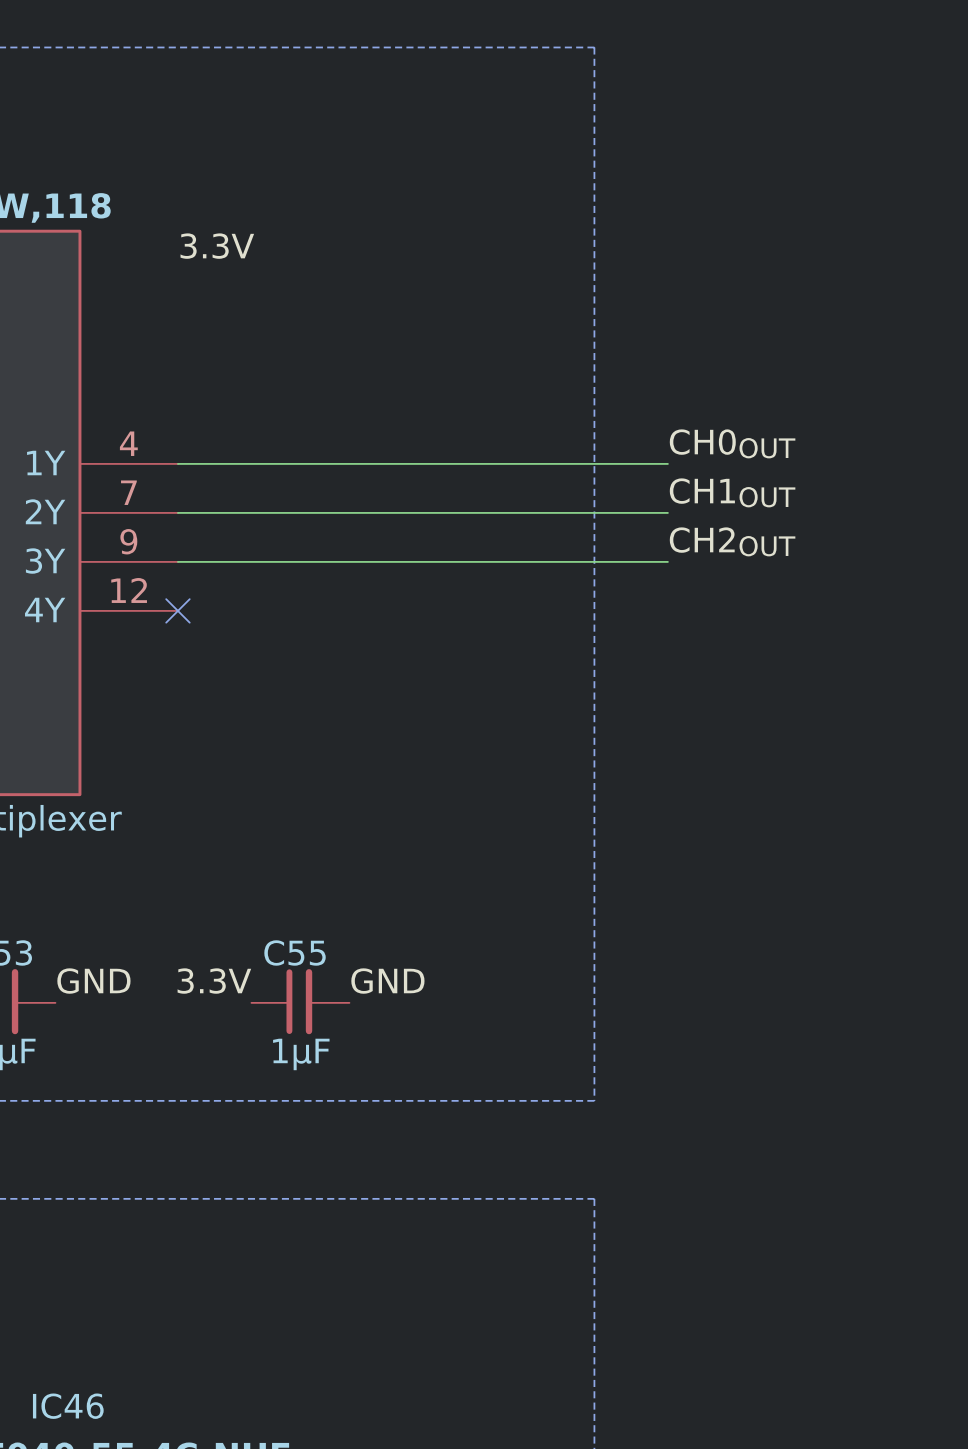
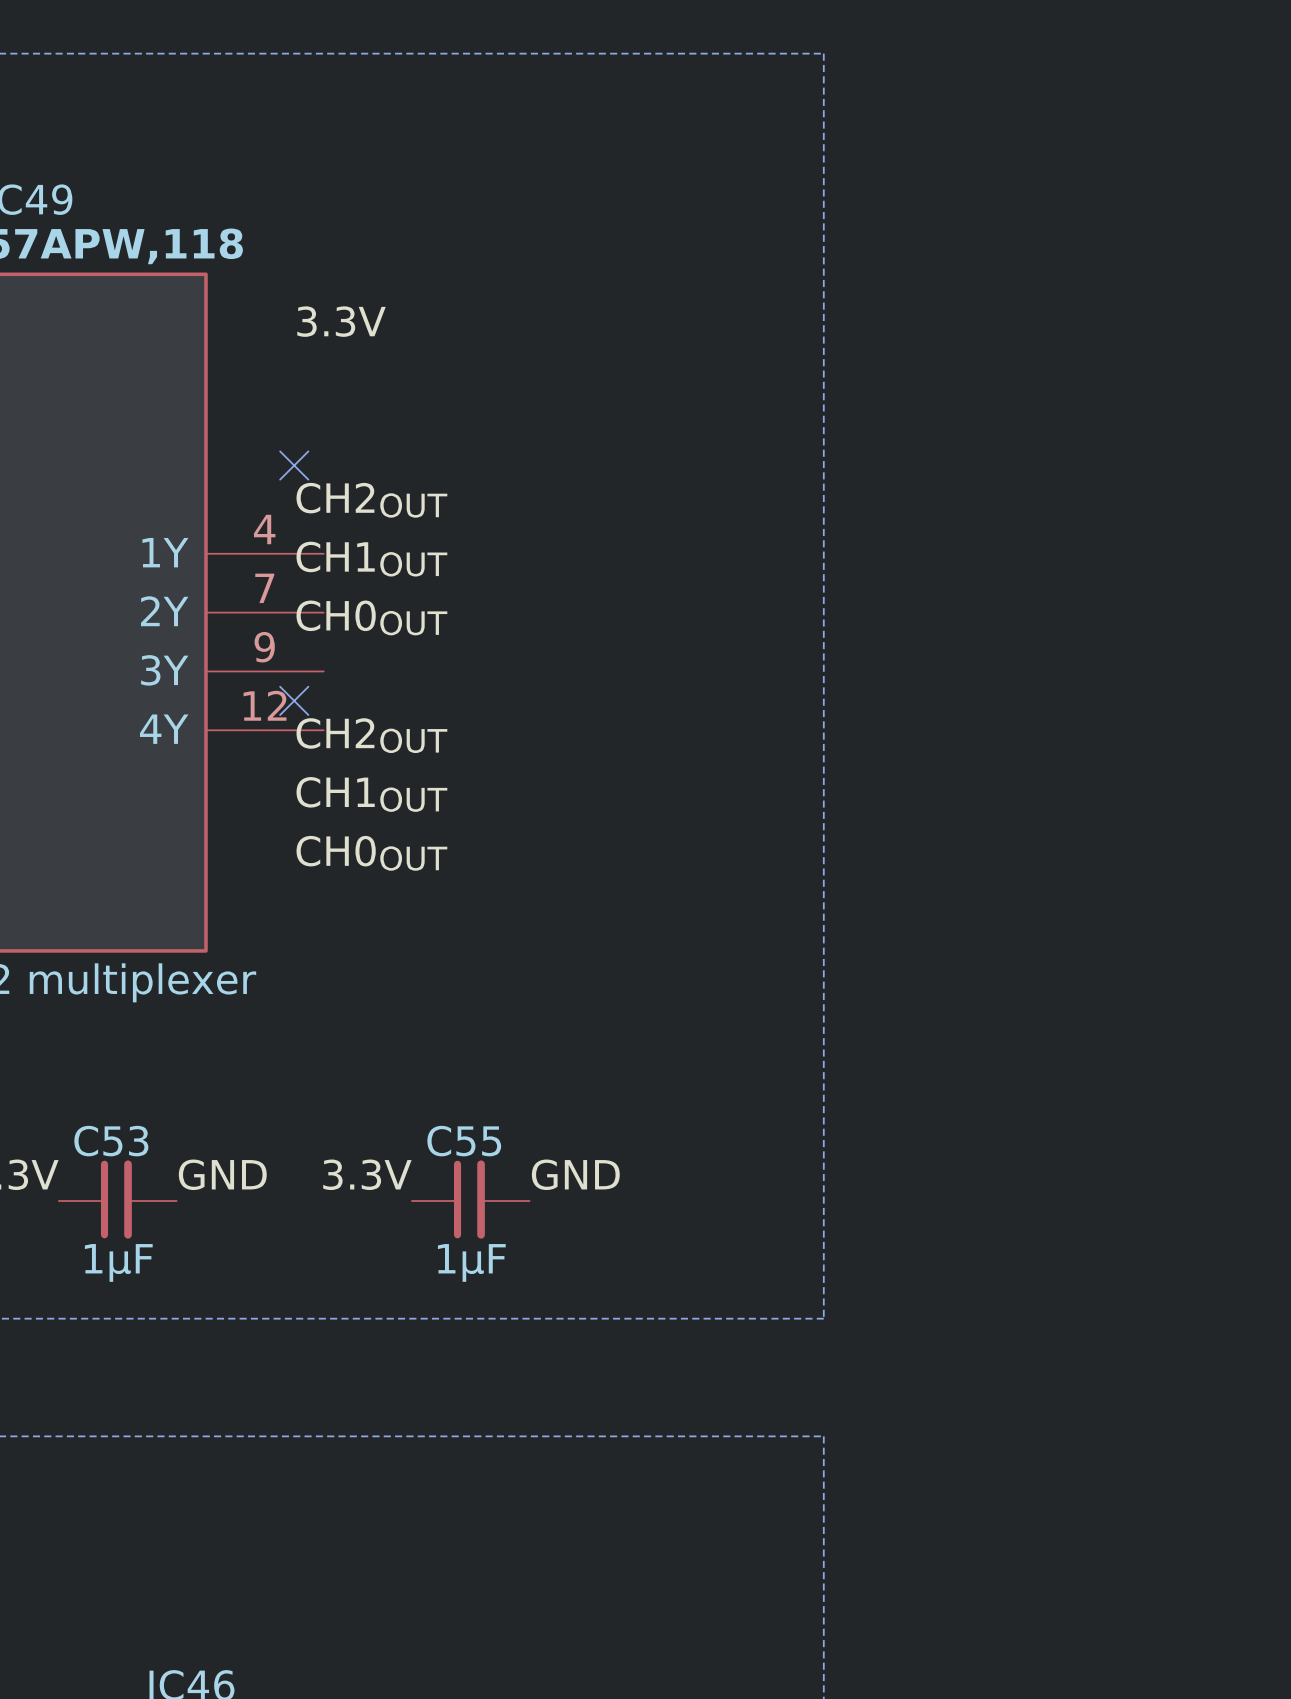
label position: 3.3V (217, 246) -> 3.3V (341, 321)
no-connect mark: none -> (294, 465)
label: none -> CH2OUT (371, 500)
label: CH0OUT (732, 443) -> none
wire: (177, 463) (667, 463) -> none
label: none -> CH1OUT (371, 559)
label: CH1OUT (732, 492) -> none
wire: (177, 512) (667, 512) -> none
label: none -> CH0OUT (371, 617)
label: CH2OUT (732, 541) -> none
wire: (177, 561) (667, 561) -> none
no-connect mark position: (177, 610) -> (294, 700)
label: none -> CH2OUT (371, 735)
label: none -> CH1OUT (371, 794)
label: none -> CH0OUT (371, 853)

